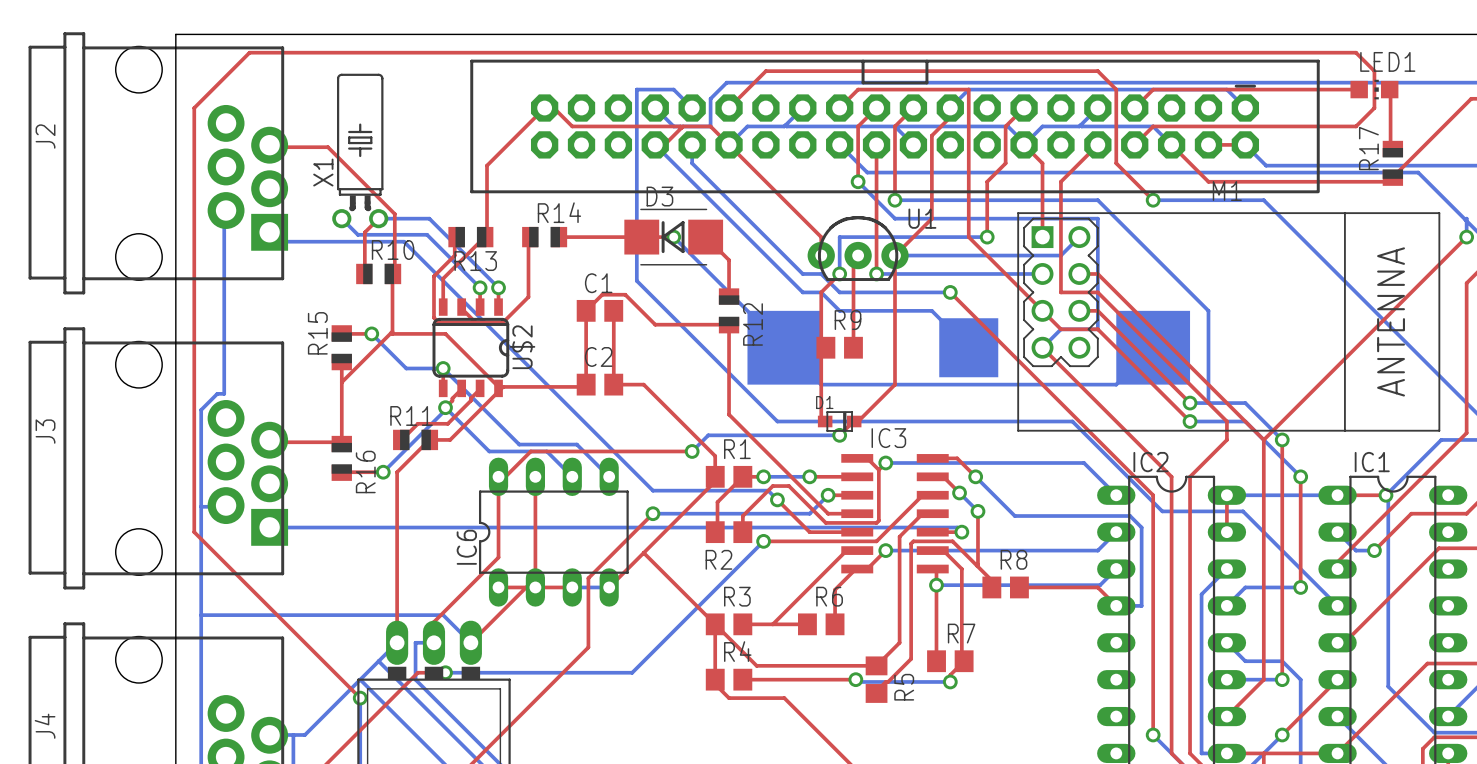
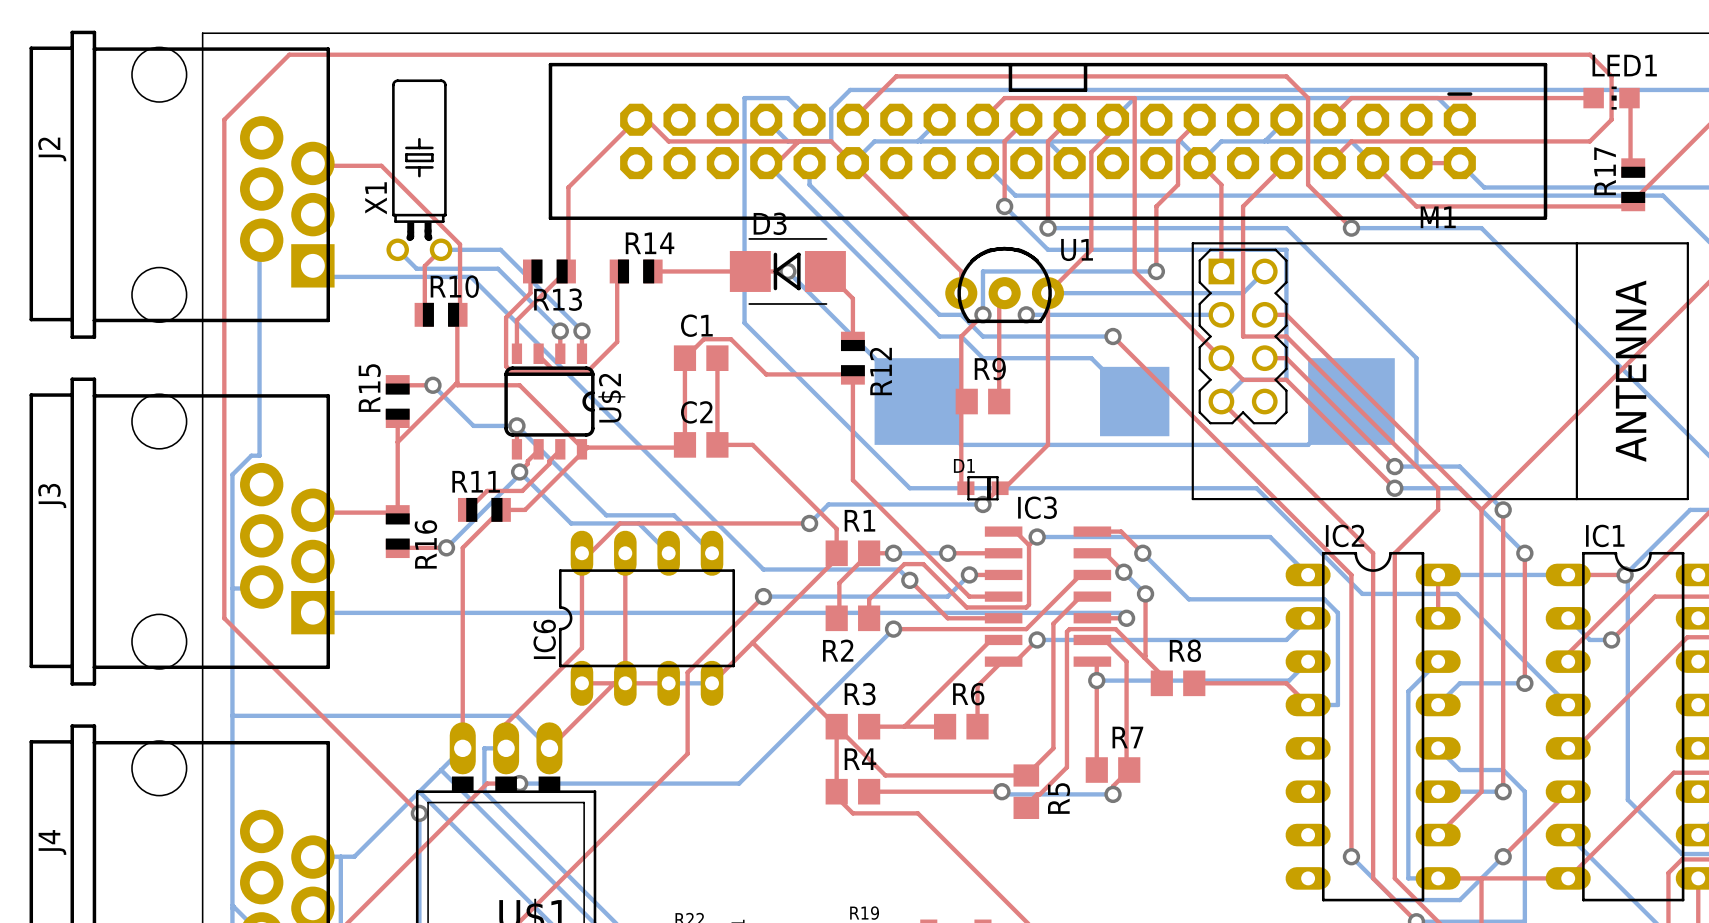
top track: (876, 144) (876, 273) -> none

